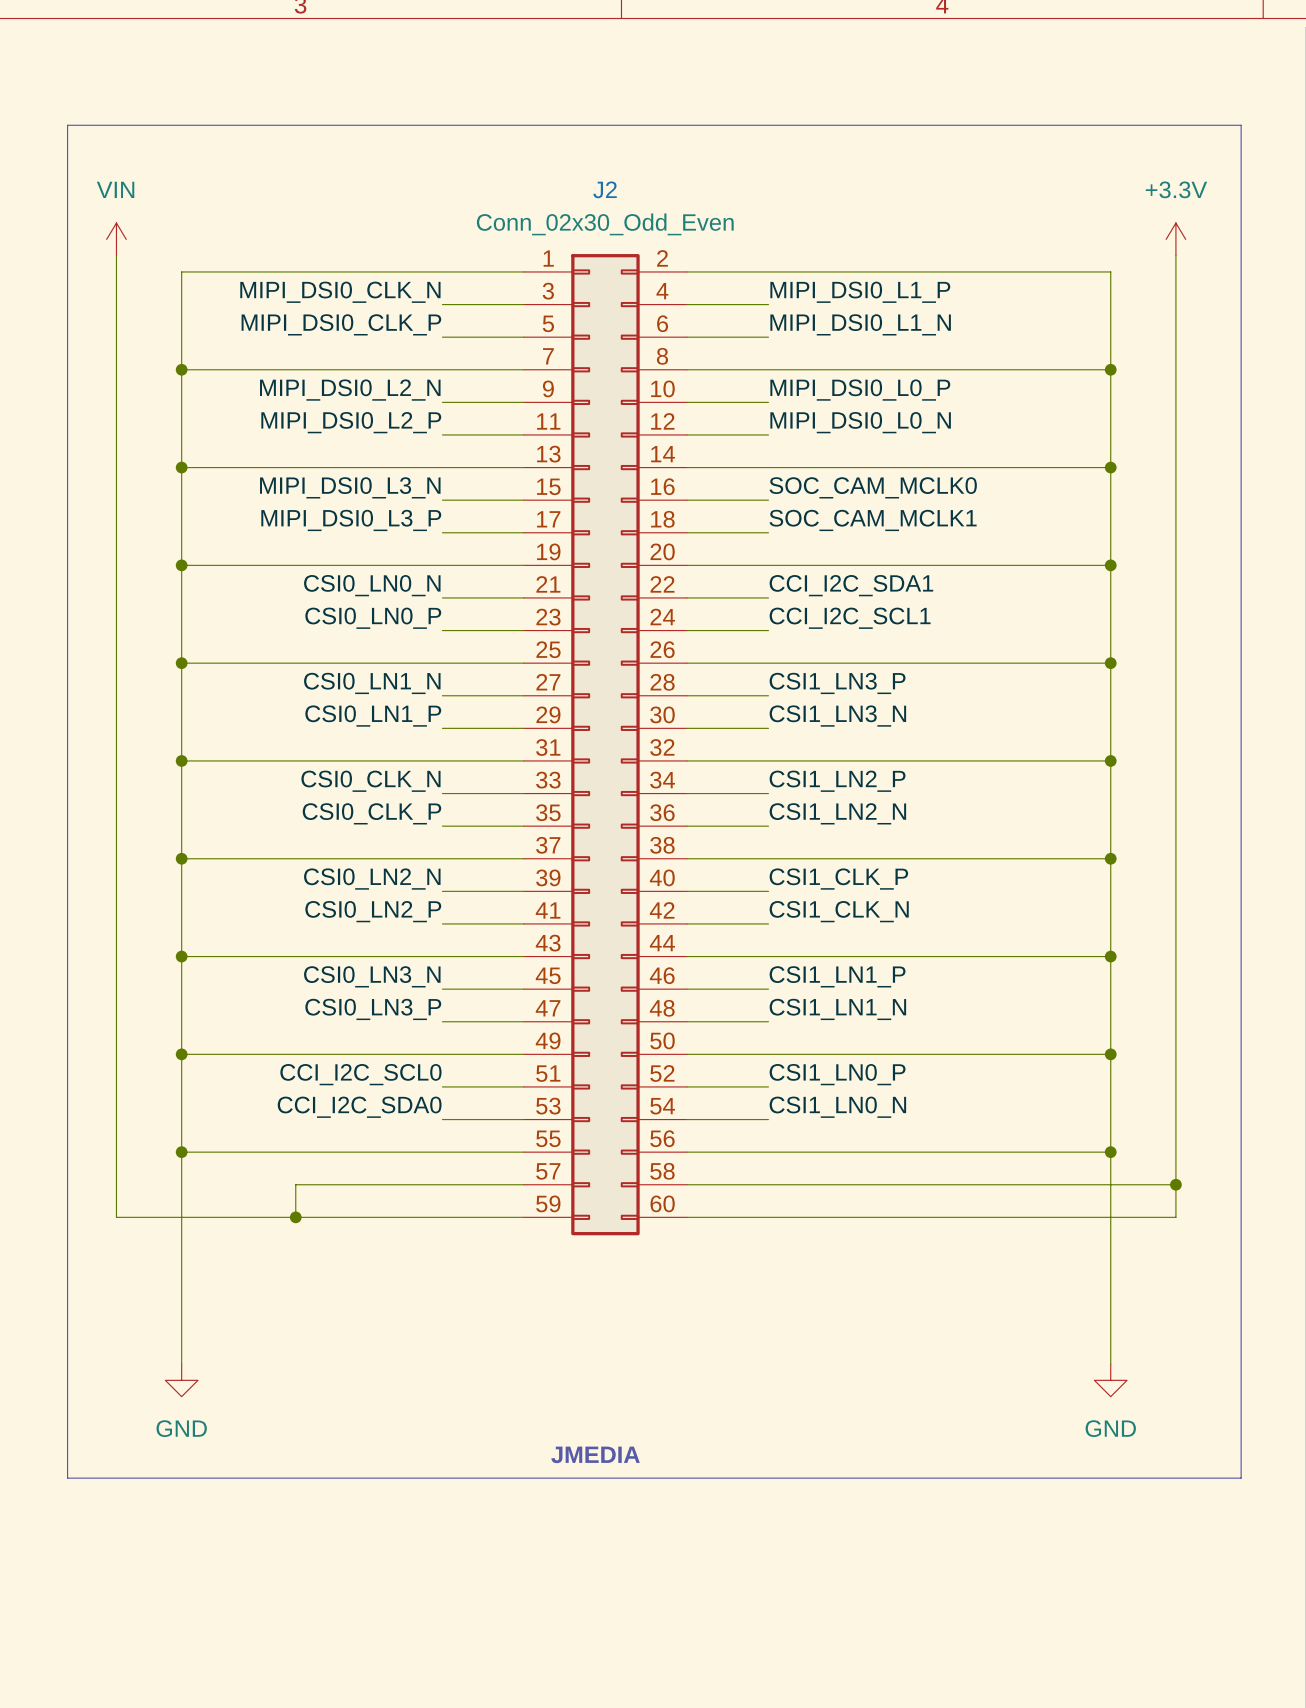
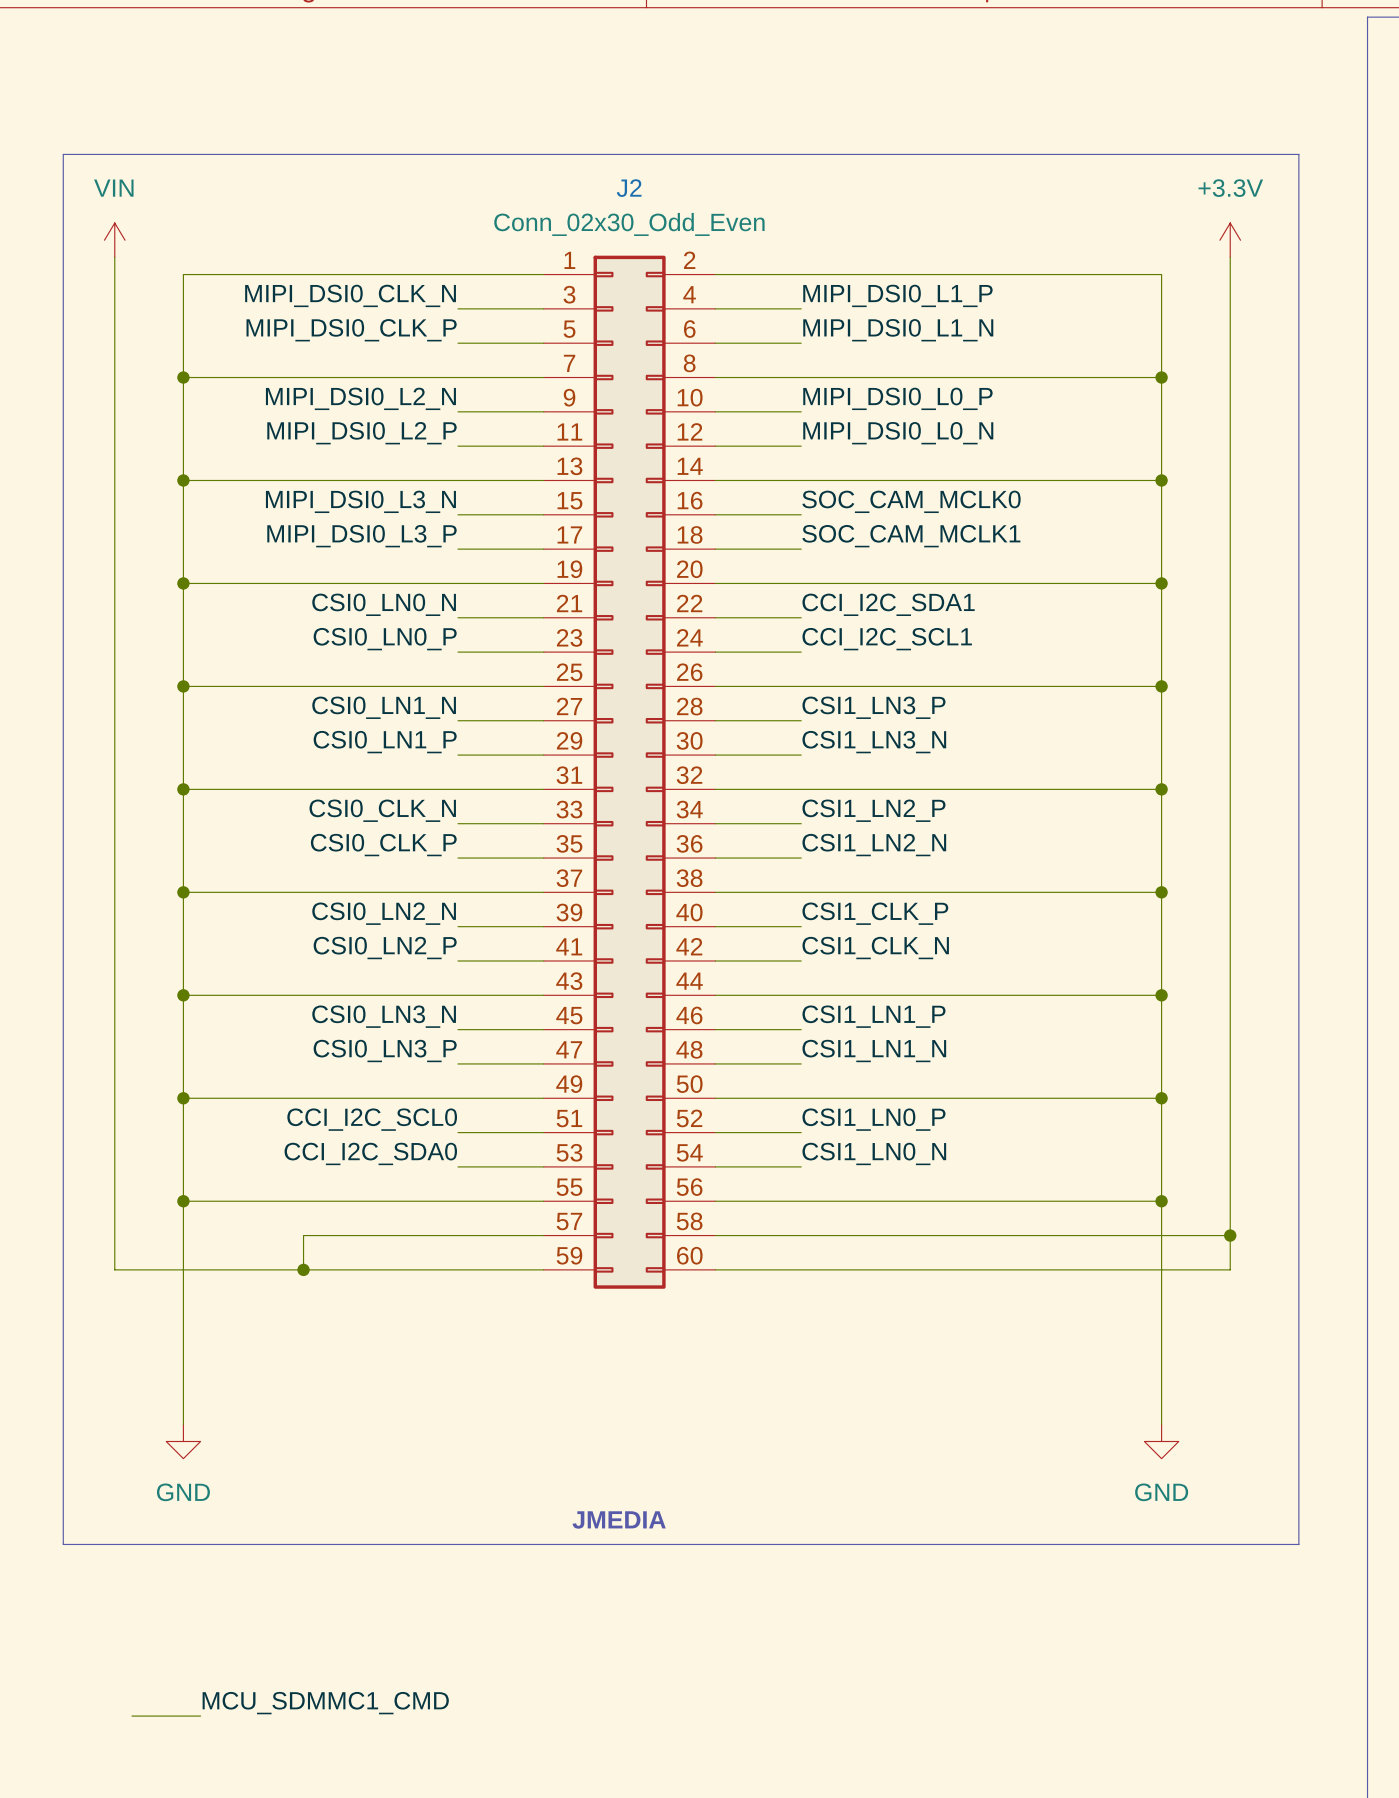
line: (67, 157) (67, 125) (1241, 125) (1241, 157) -> (63, 154) (1298, 154)
label: none -> MCU_SDMMC1_CMD (325, 1703)
wire: none -> (131, 1716) (200, 1716)

